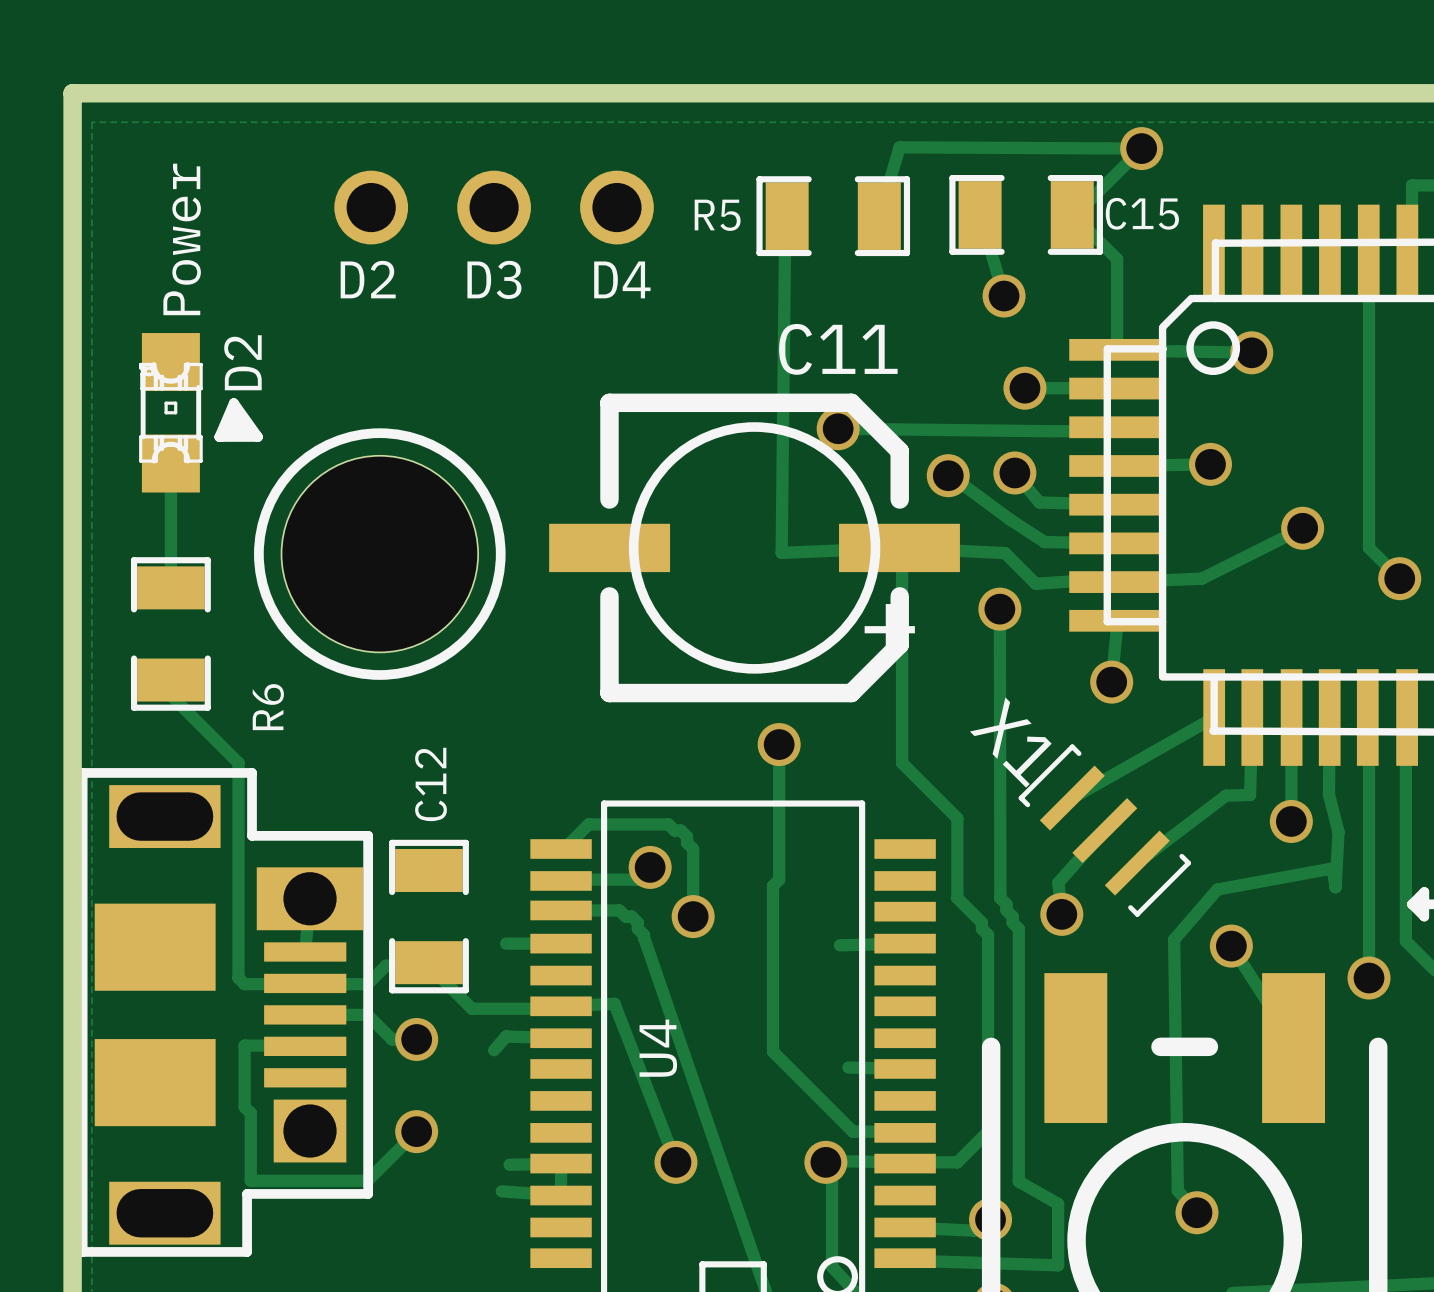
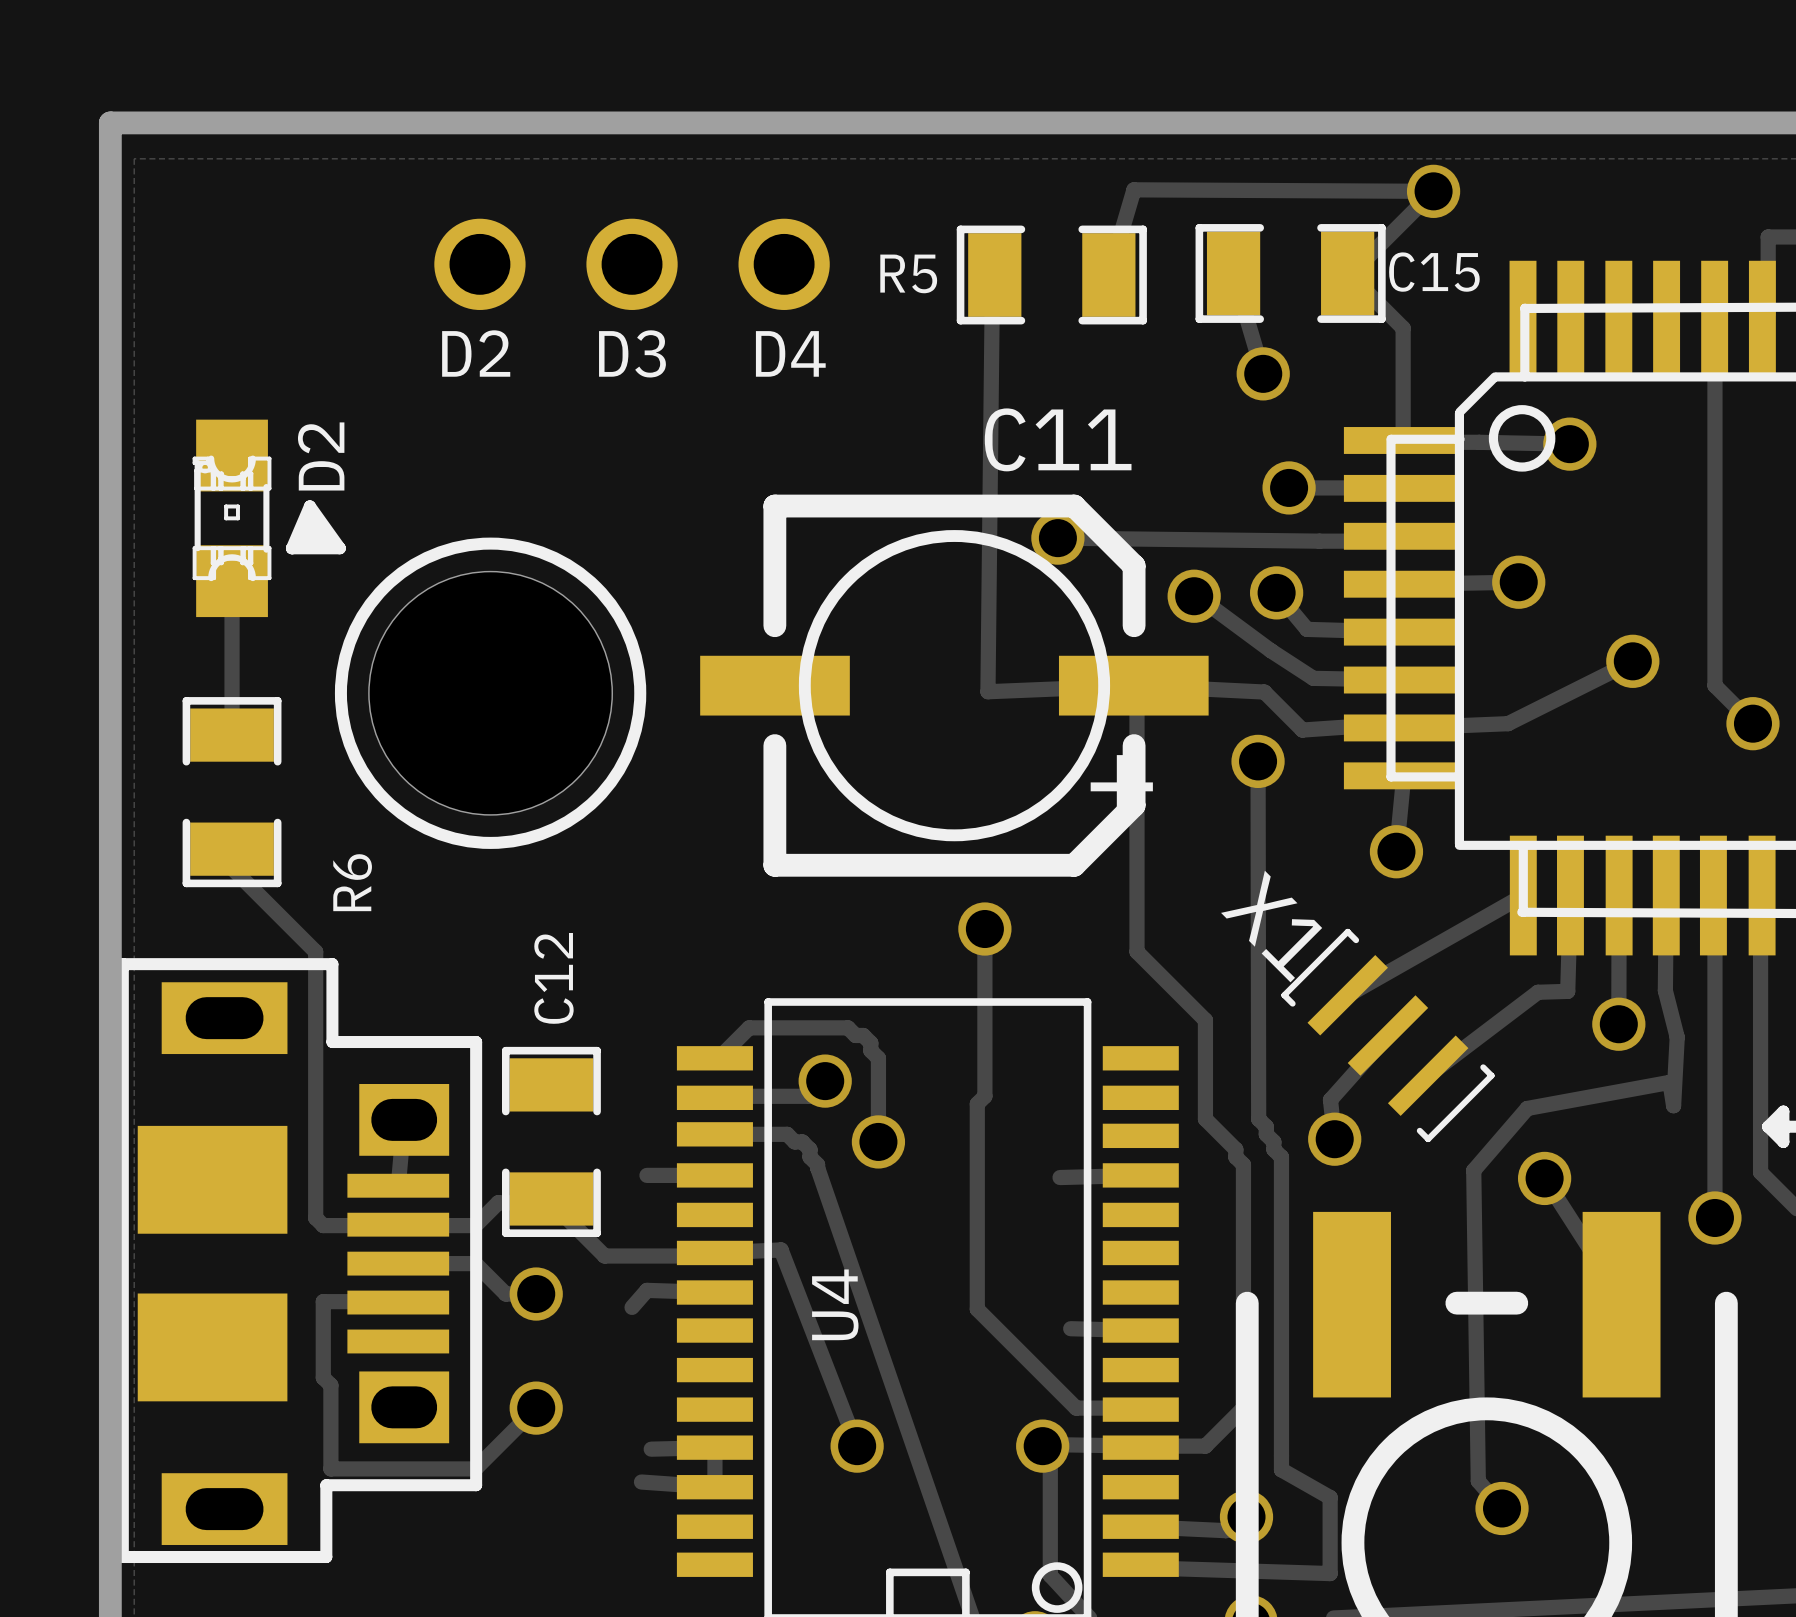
text: Power (182, 239) -> none
part footprint: [77, 768, 373, 1257] -> [116, 958, 483, 1564]

